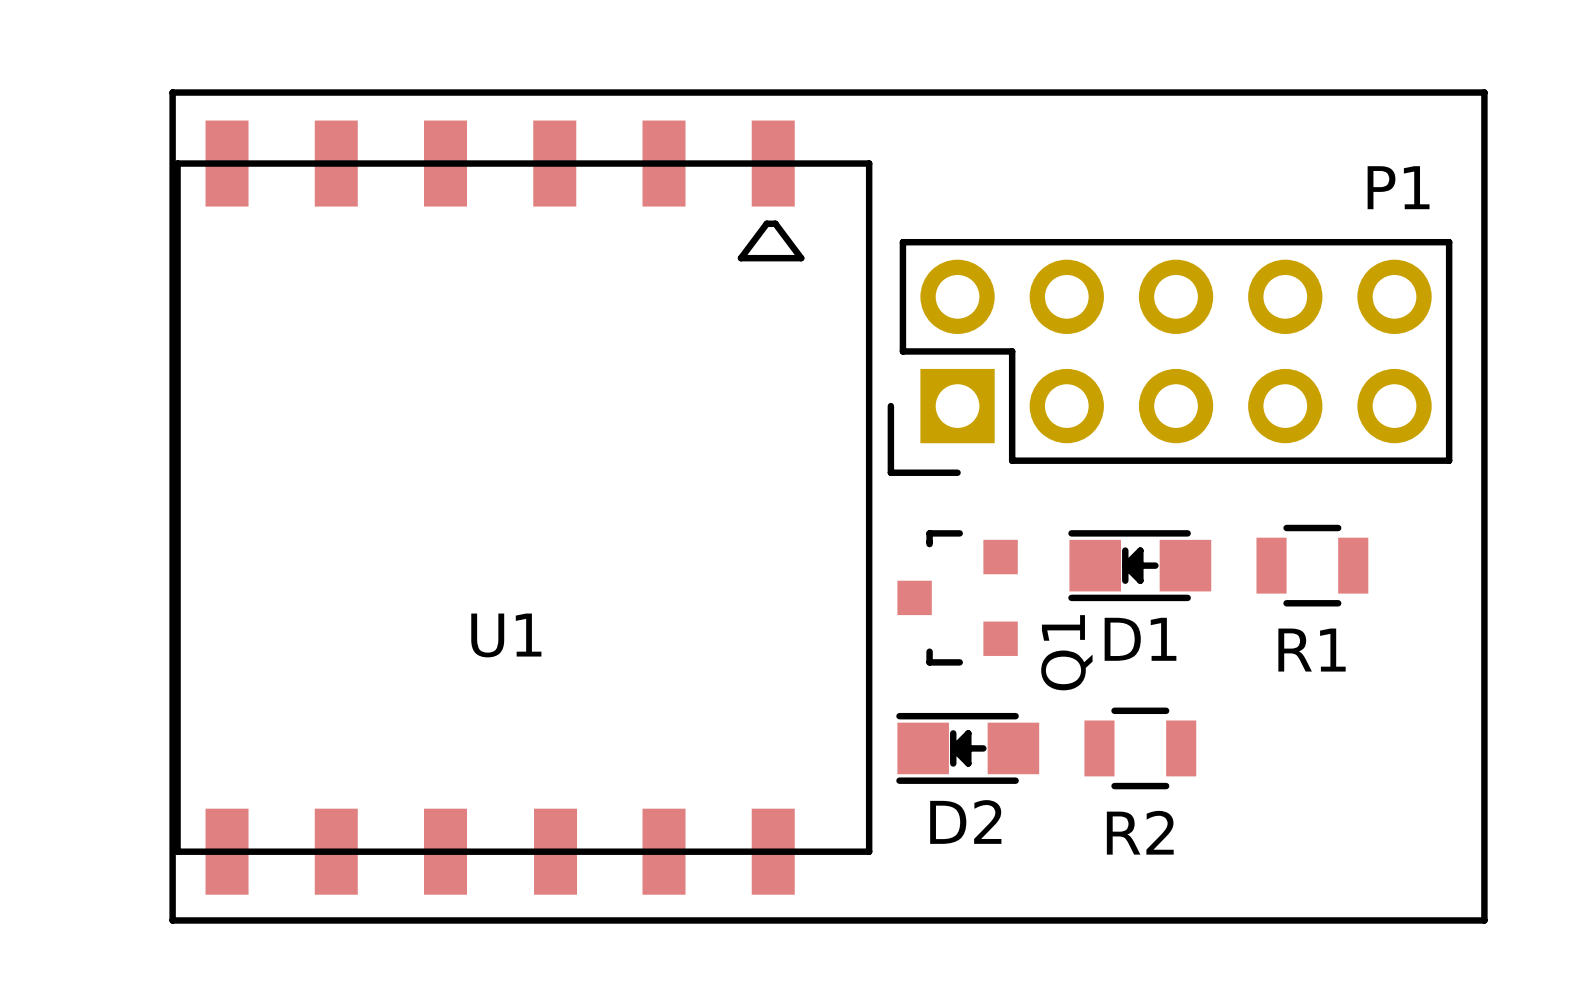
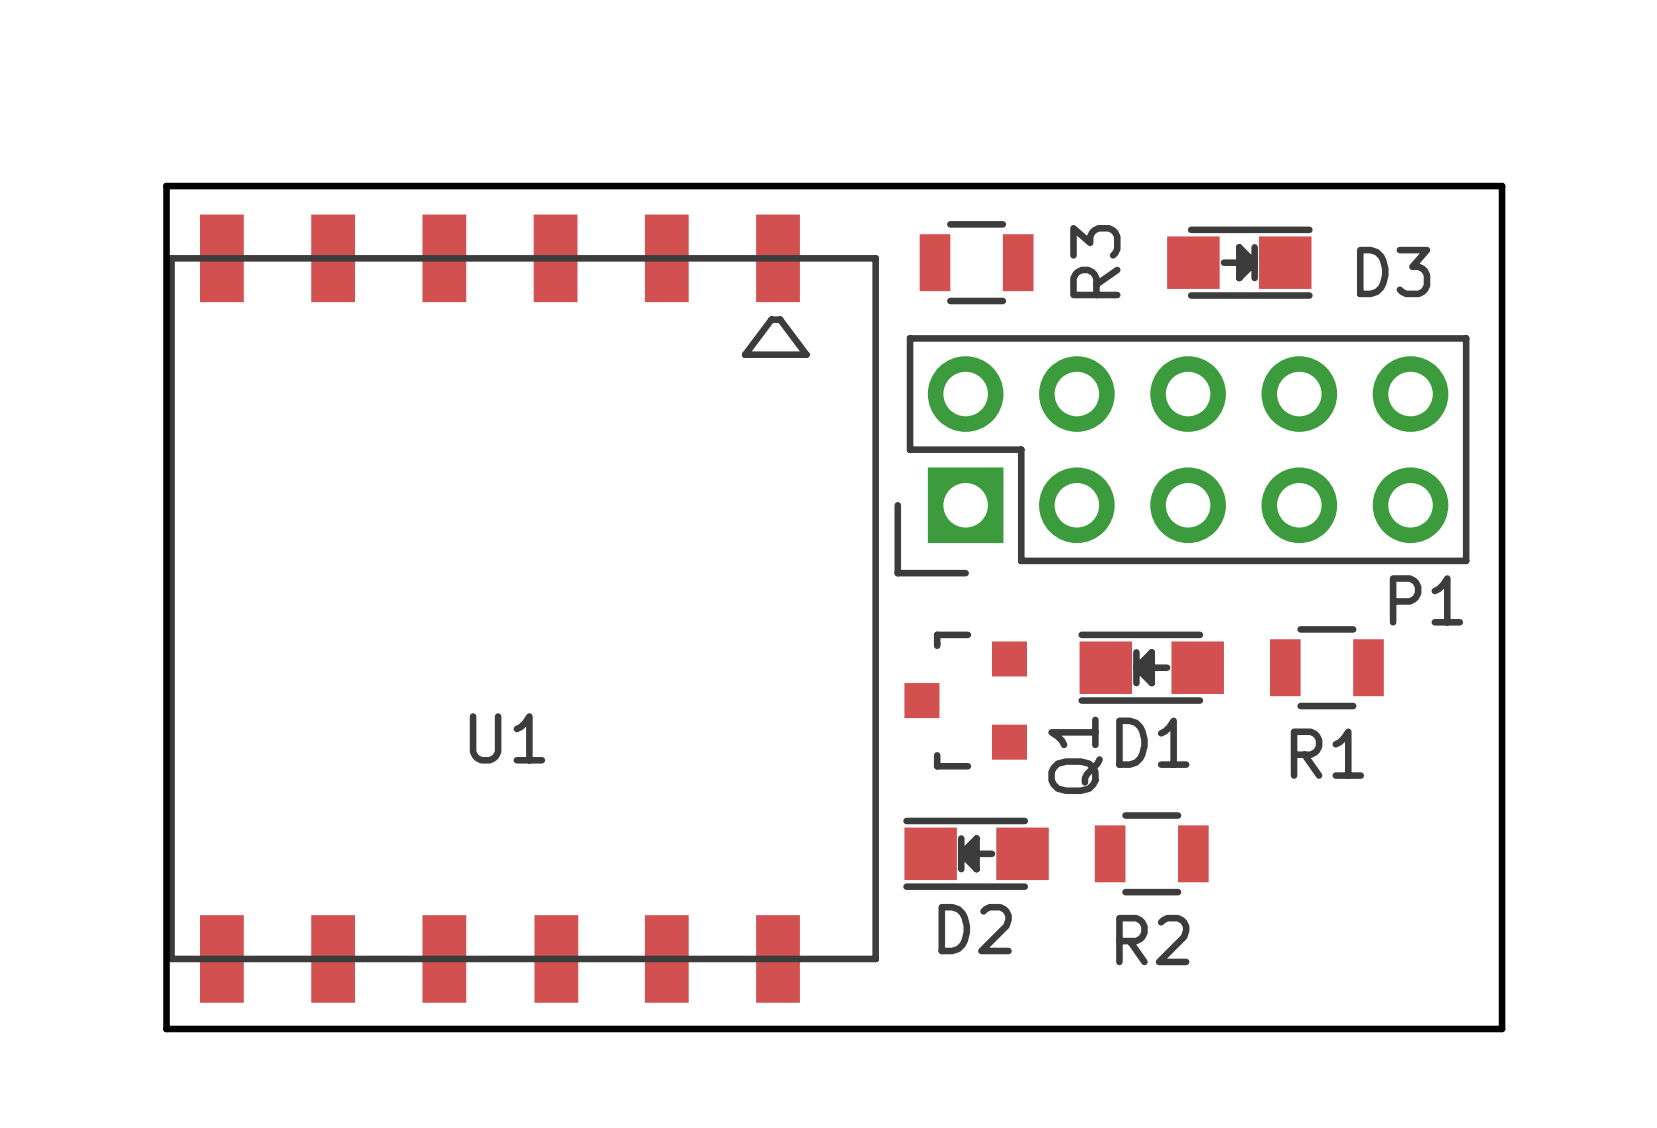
R3: none -> (976, 262)
D3: none -> (1239, 262)
P1 name position: P1 (1398, 187) -> P1 (1426, 600)

